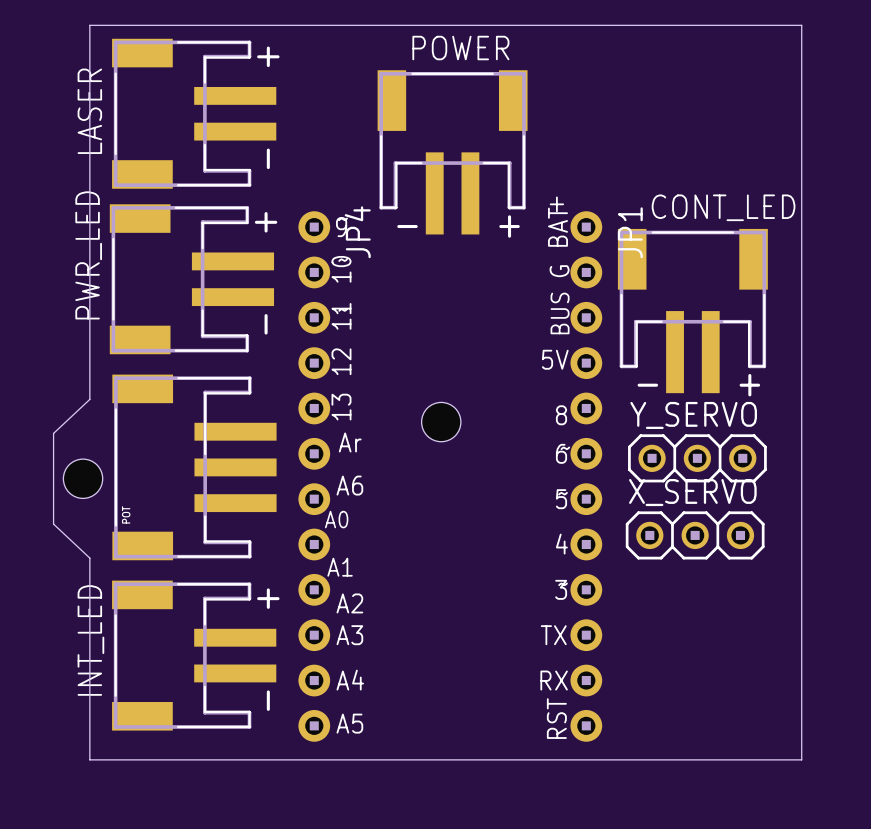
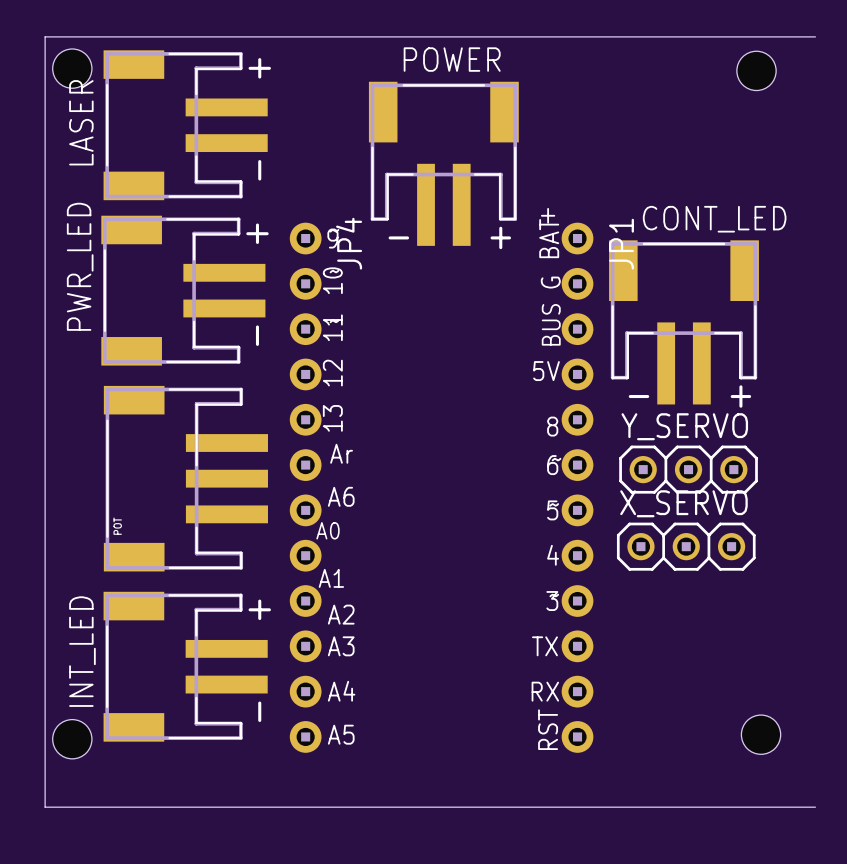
board edge: (89, 25) (89, 399) (53, 433) (53, 524) (89, 558) (89, 759) (801, 759) (801, 25) -> (815, 36) (792, 36)
board edge: none -> (81, 36) (45, 36) (45, 807) (815, 807)
hole: none -> (72, 68)
hole: none -> (756, 70)
hole: (441, 422) -> none
hole: (83, 478) -> none
hole: none -> (761, 734)
hole: none -> (72, 739)

